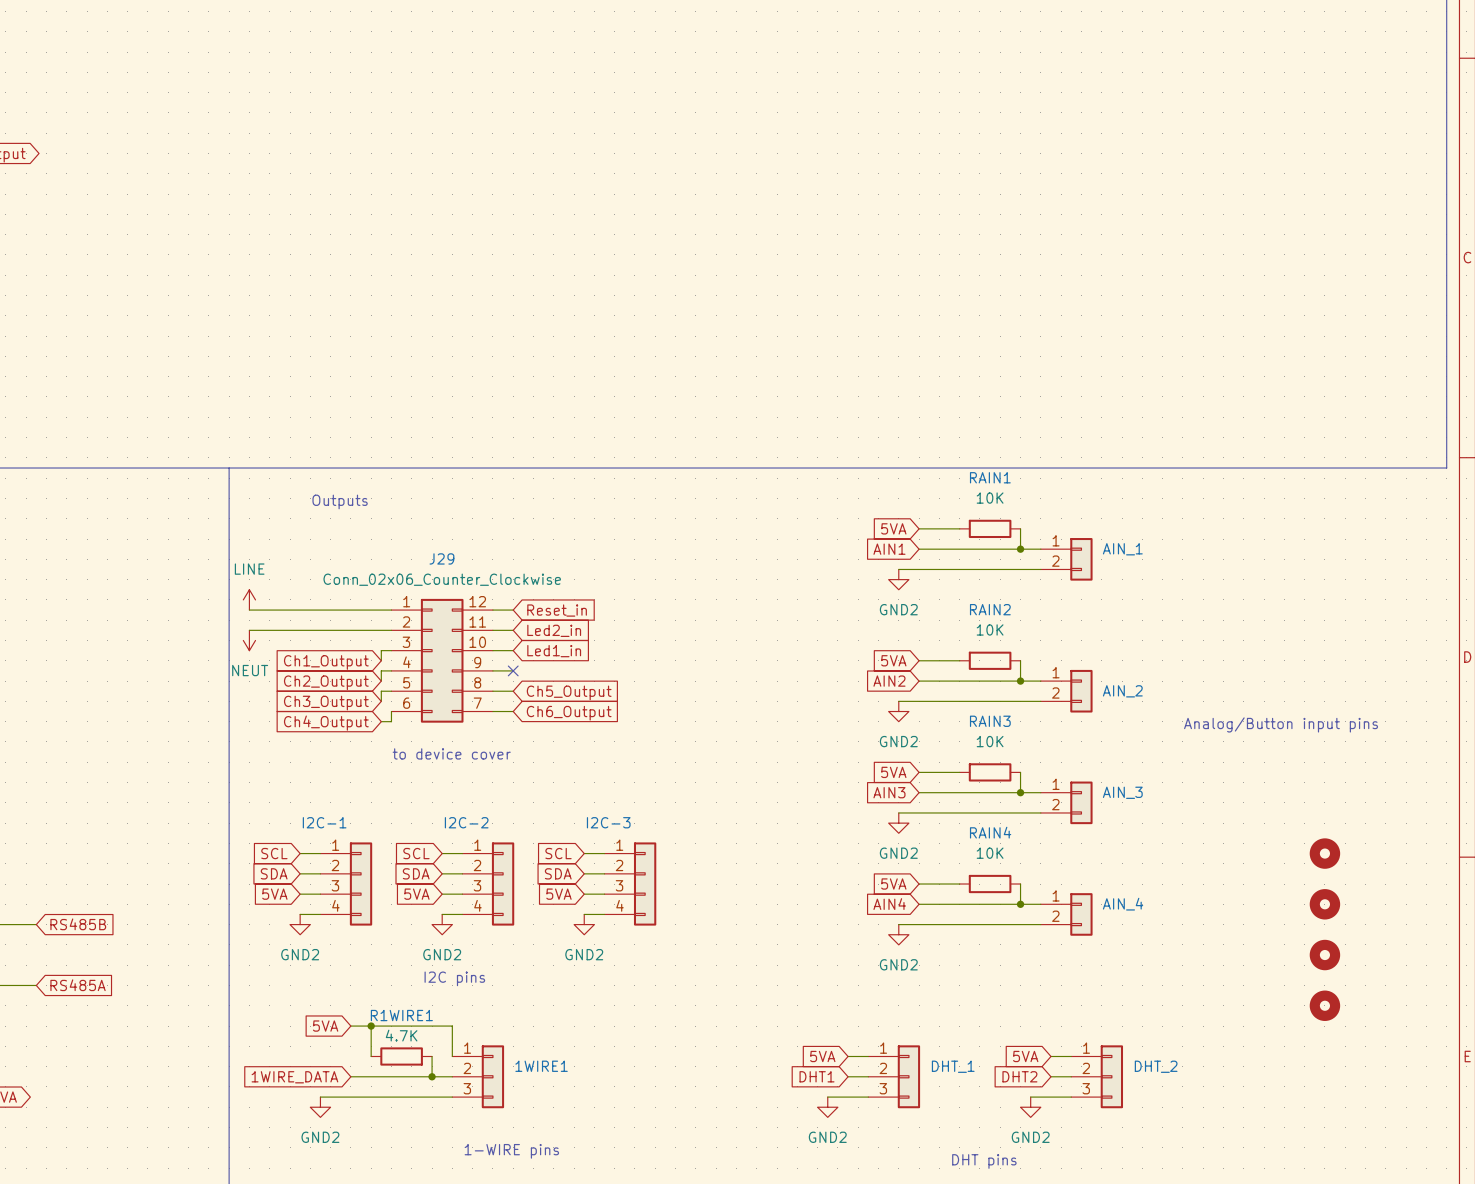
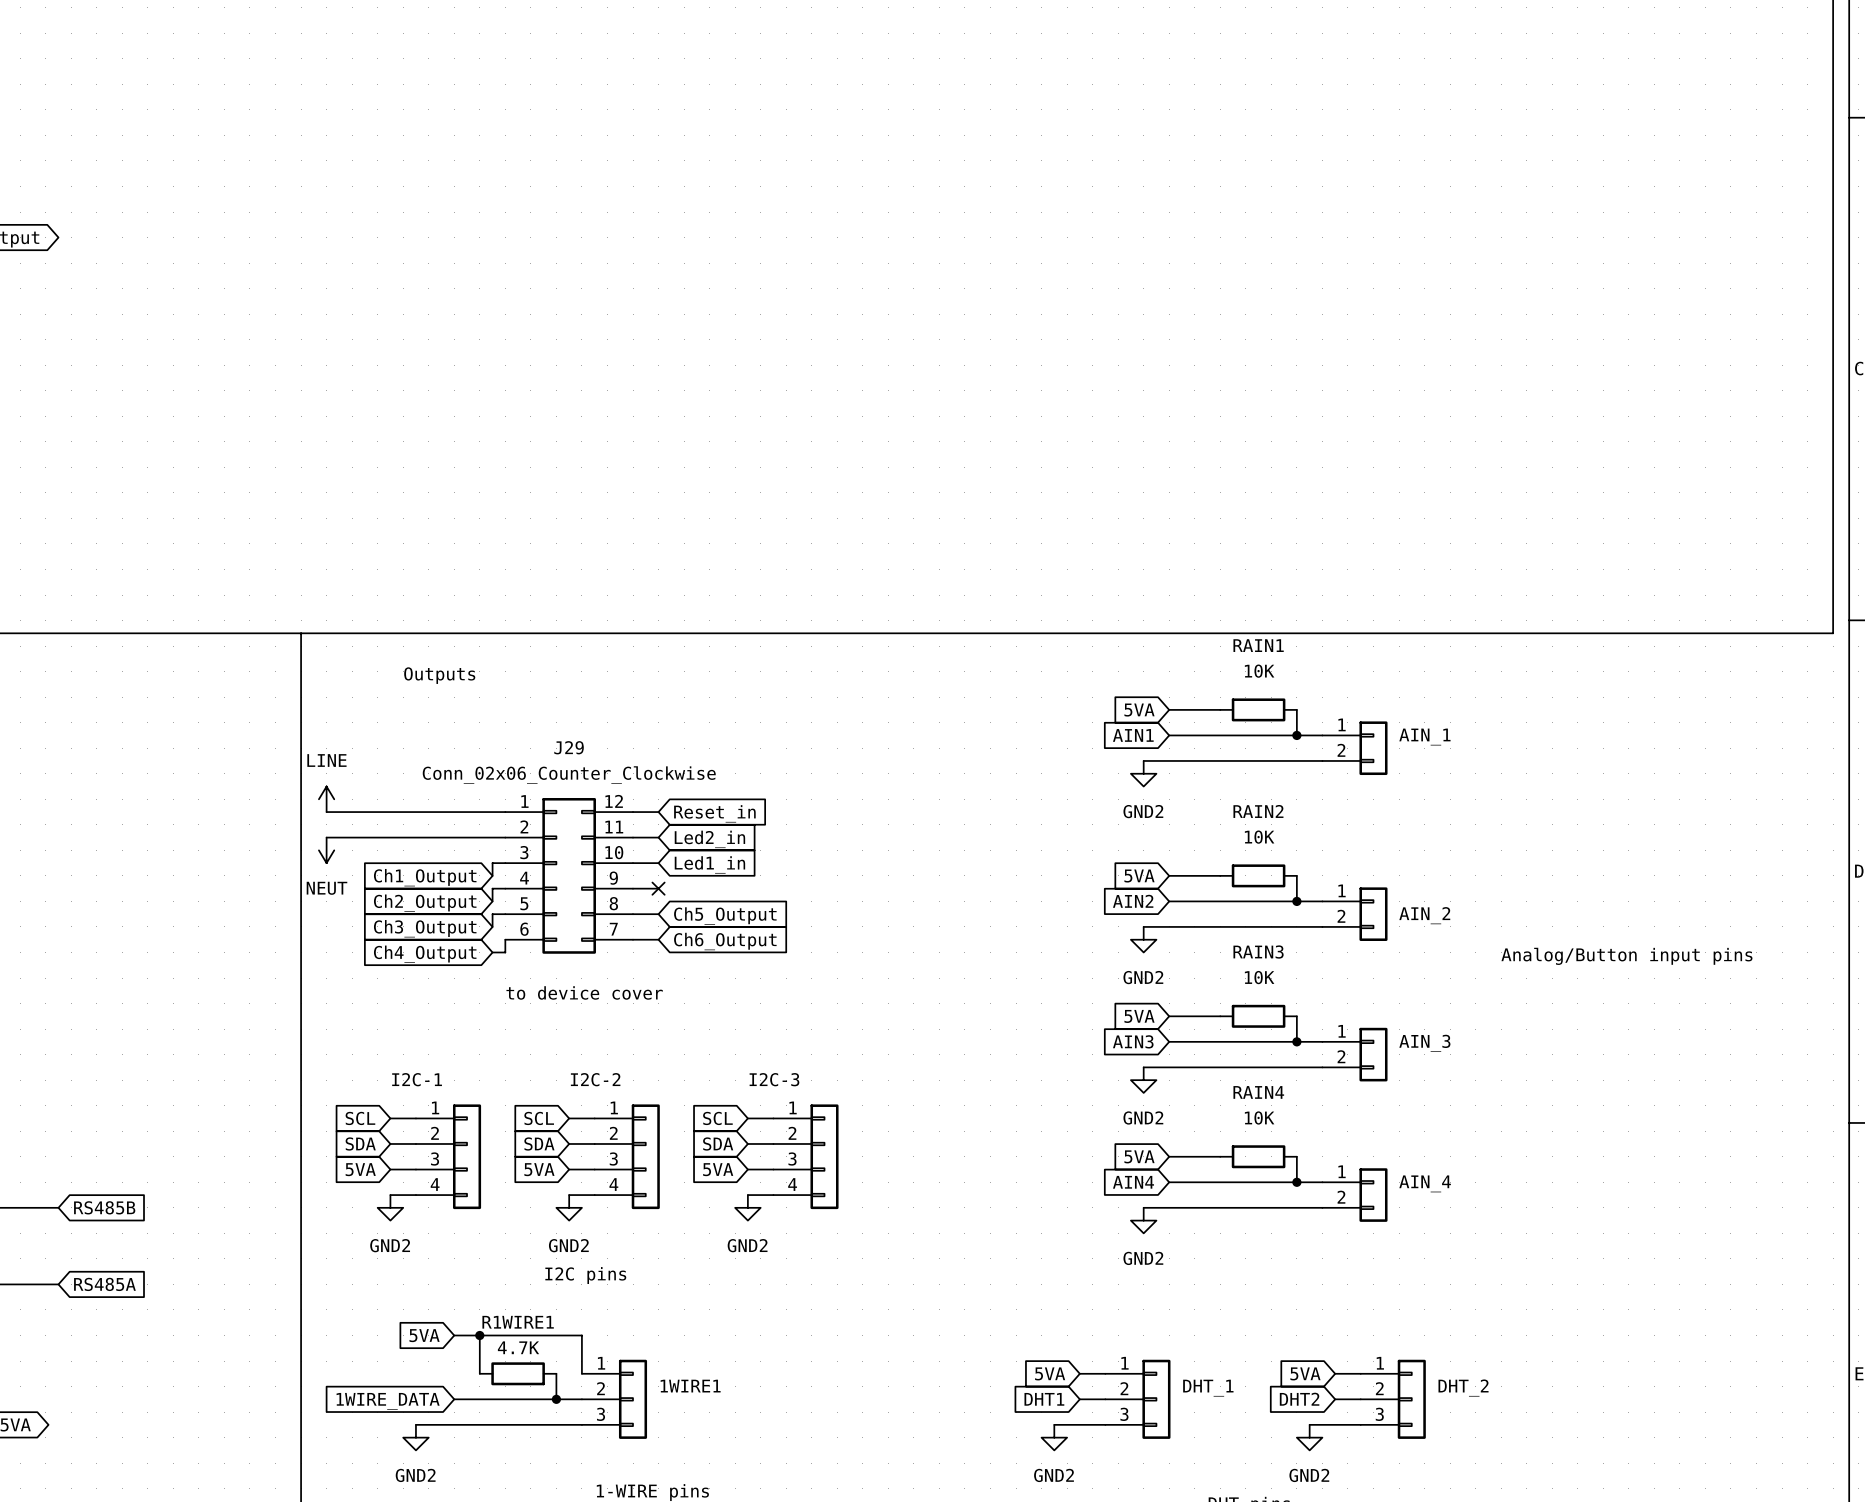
part: (1324, 853) -> none
part: (1324, 904) -> none
part: (1324, 955) -> none
part: (1324, 1005) -> none

